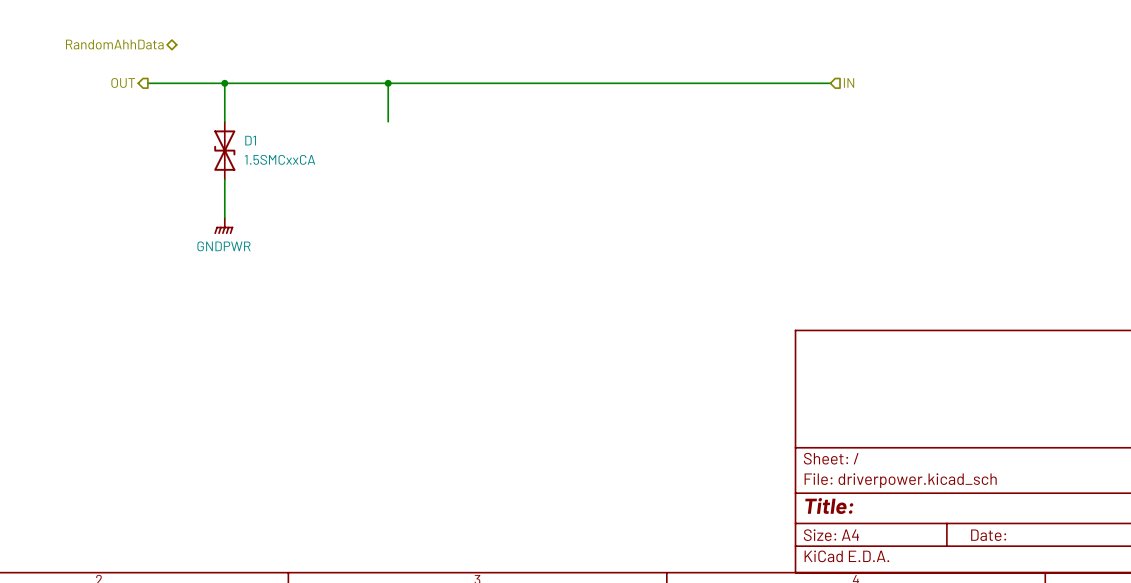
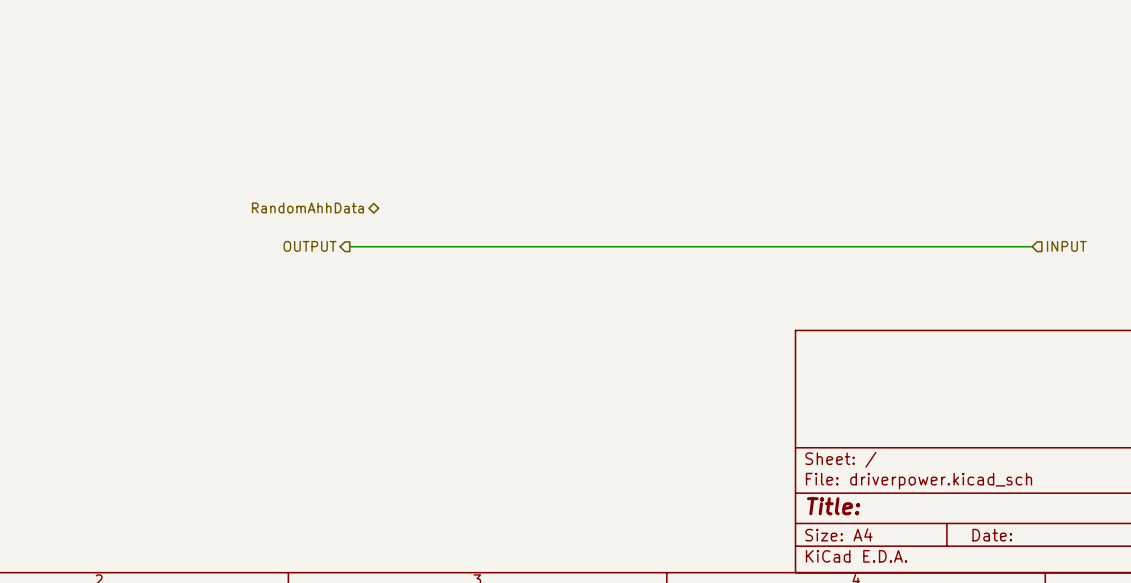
hierarchical label: RandomAhhData (114, 44) -> none
hierarchical label: OUT (123, 82) -> none
hierarchical label: IN (849, 82) -> none
wire: (147, 83) (830, 83) -> none
wire: (224, 83) (224, 121) -> none
junction: (224, 83) -> none
wire: (388, 83) (388, 121) -> none
junction: (388, 83) -> none
D1: 1.5SMCxxCA (224, 150) -> none
wire: (224, 179) (224, 217) -> none
hierarchical label: none -> RandomAhhData (307, 207)
power symbol: GNDPWR (223, 225) -> none
hierarchical label: none -> OUTPUT (310, 246)
wire: none -> (349, 246) (1032, 246)
hierarchical label: none -> INPUT (1066, 246)

